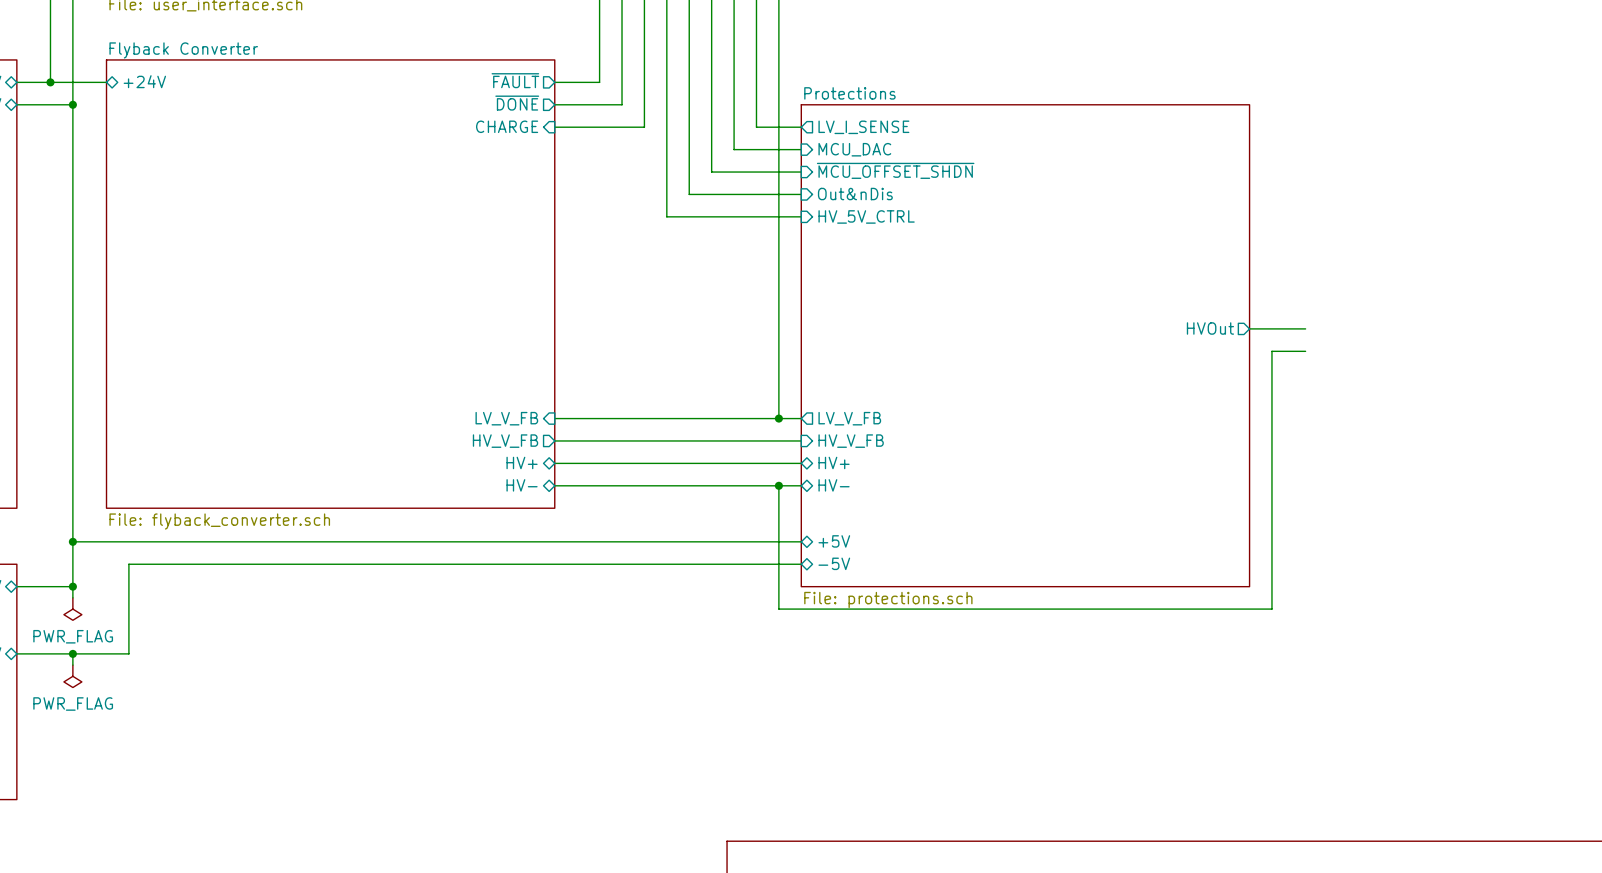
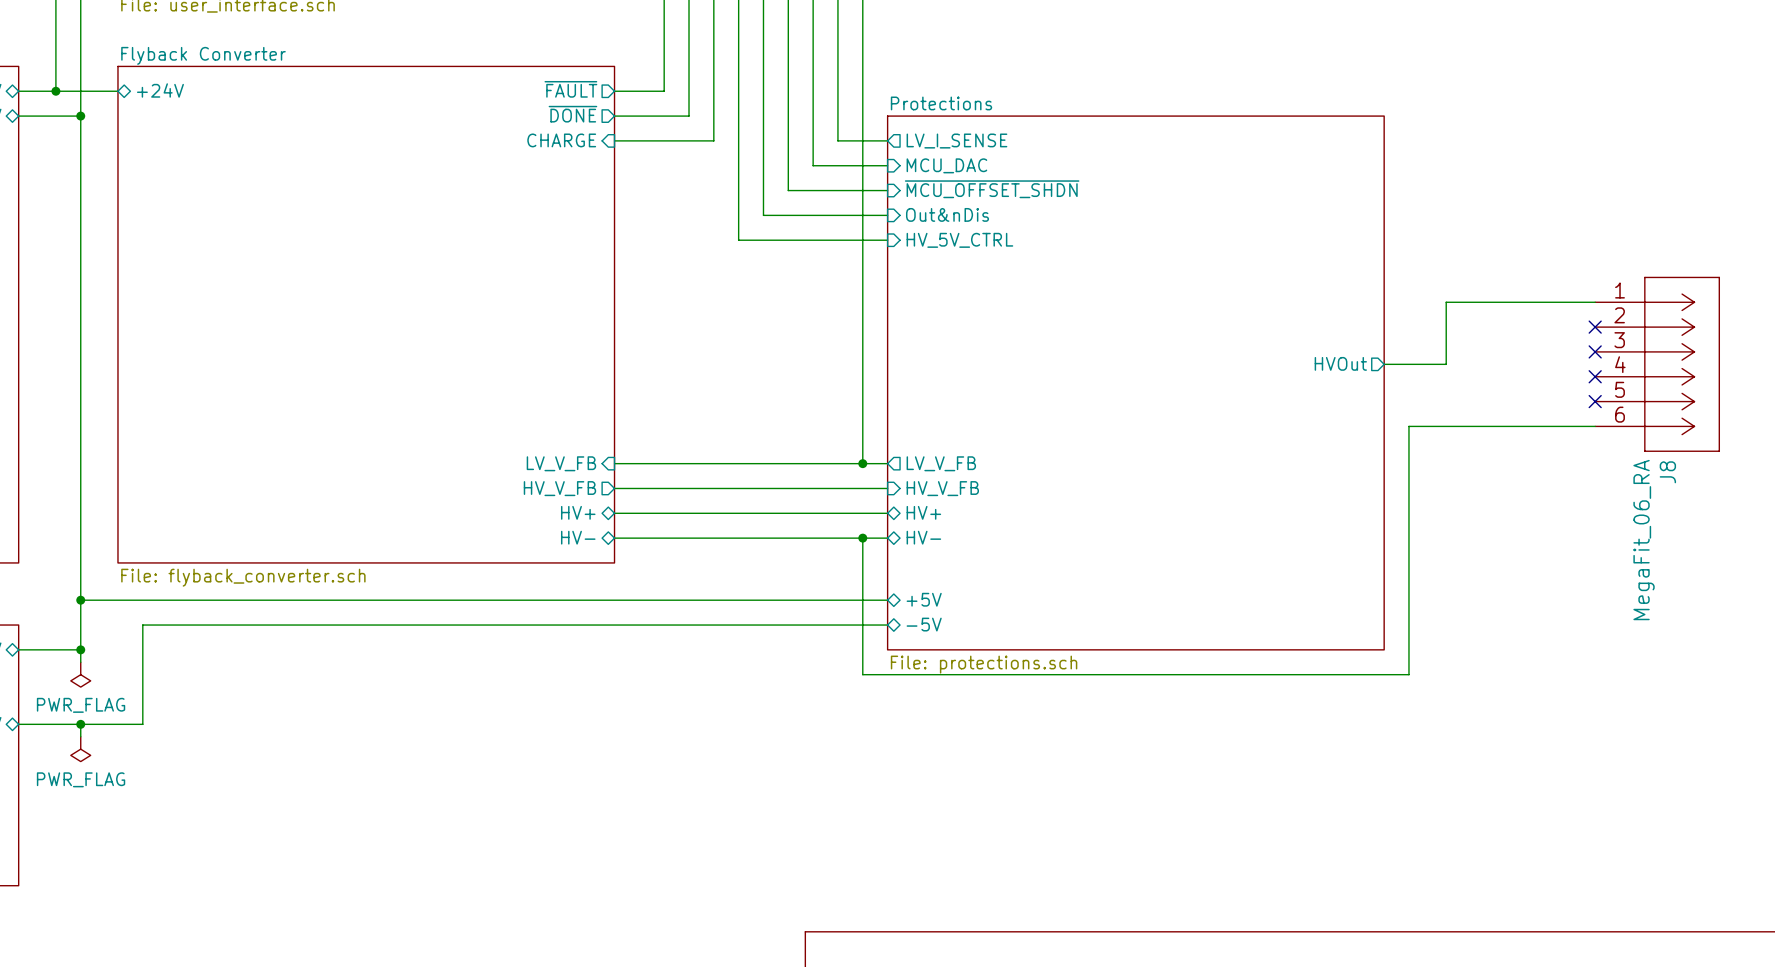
wire: none -> (1595, 302) (1446, 302) (1446, 364)
no-connect mark: none -> (1595, 327)
no-connect mark: none -> (1595, 351)
J8: none -> MegaFit_06_RA (1657, 364)
no-connect mark: none -> (1595, 376)
wire: (1305, 351) (1271, 351) (1271, 384) -> (1595, 426) (1408, 426)
no-connect mark: none -> (1595, 401)

